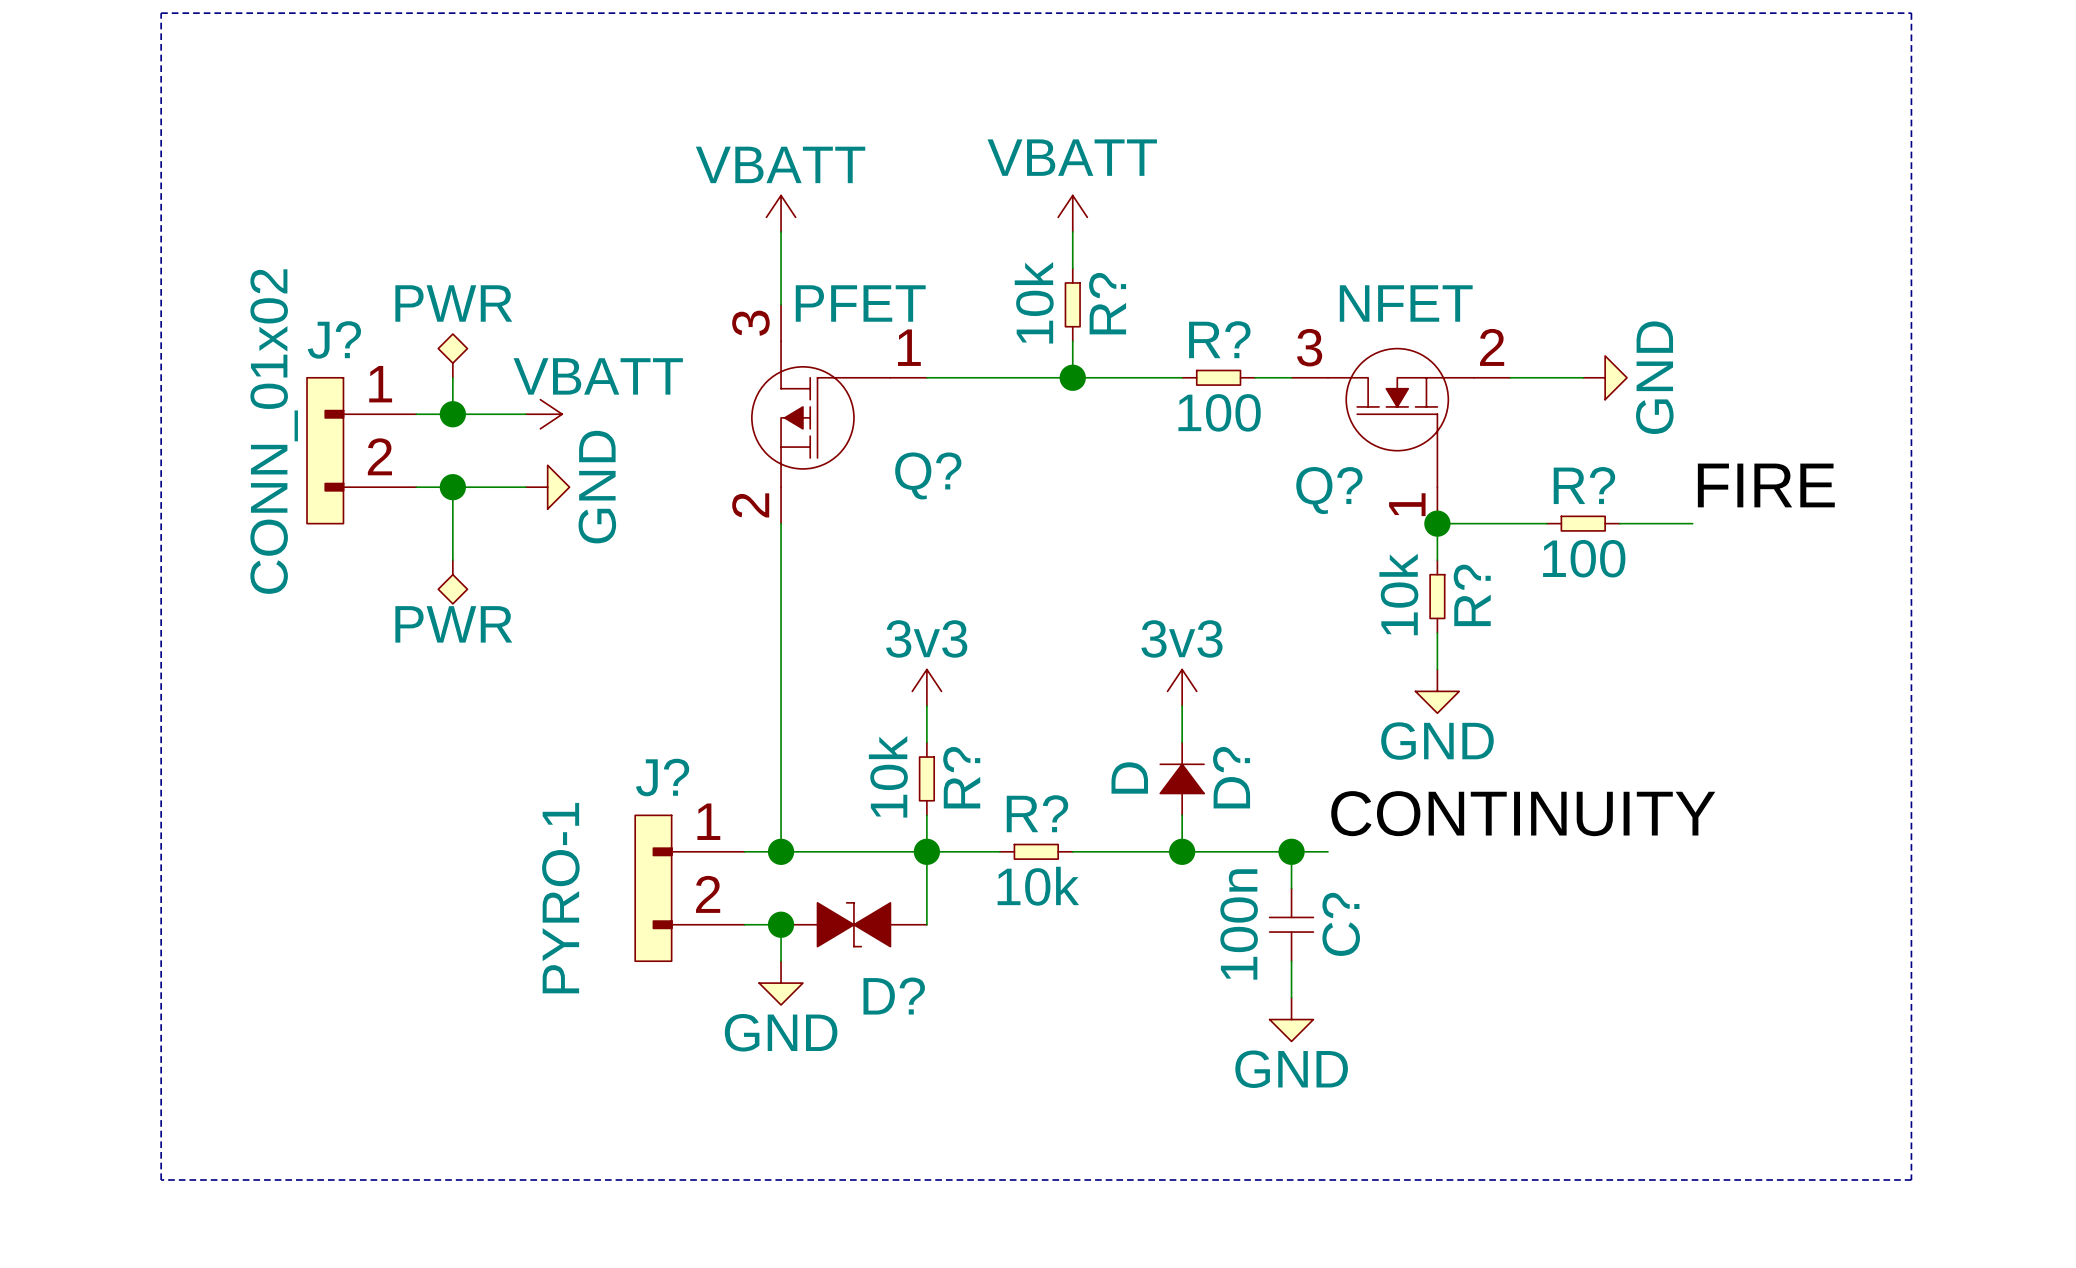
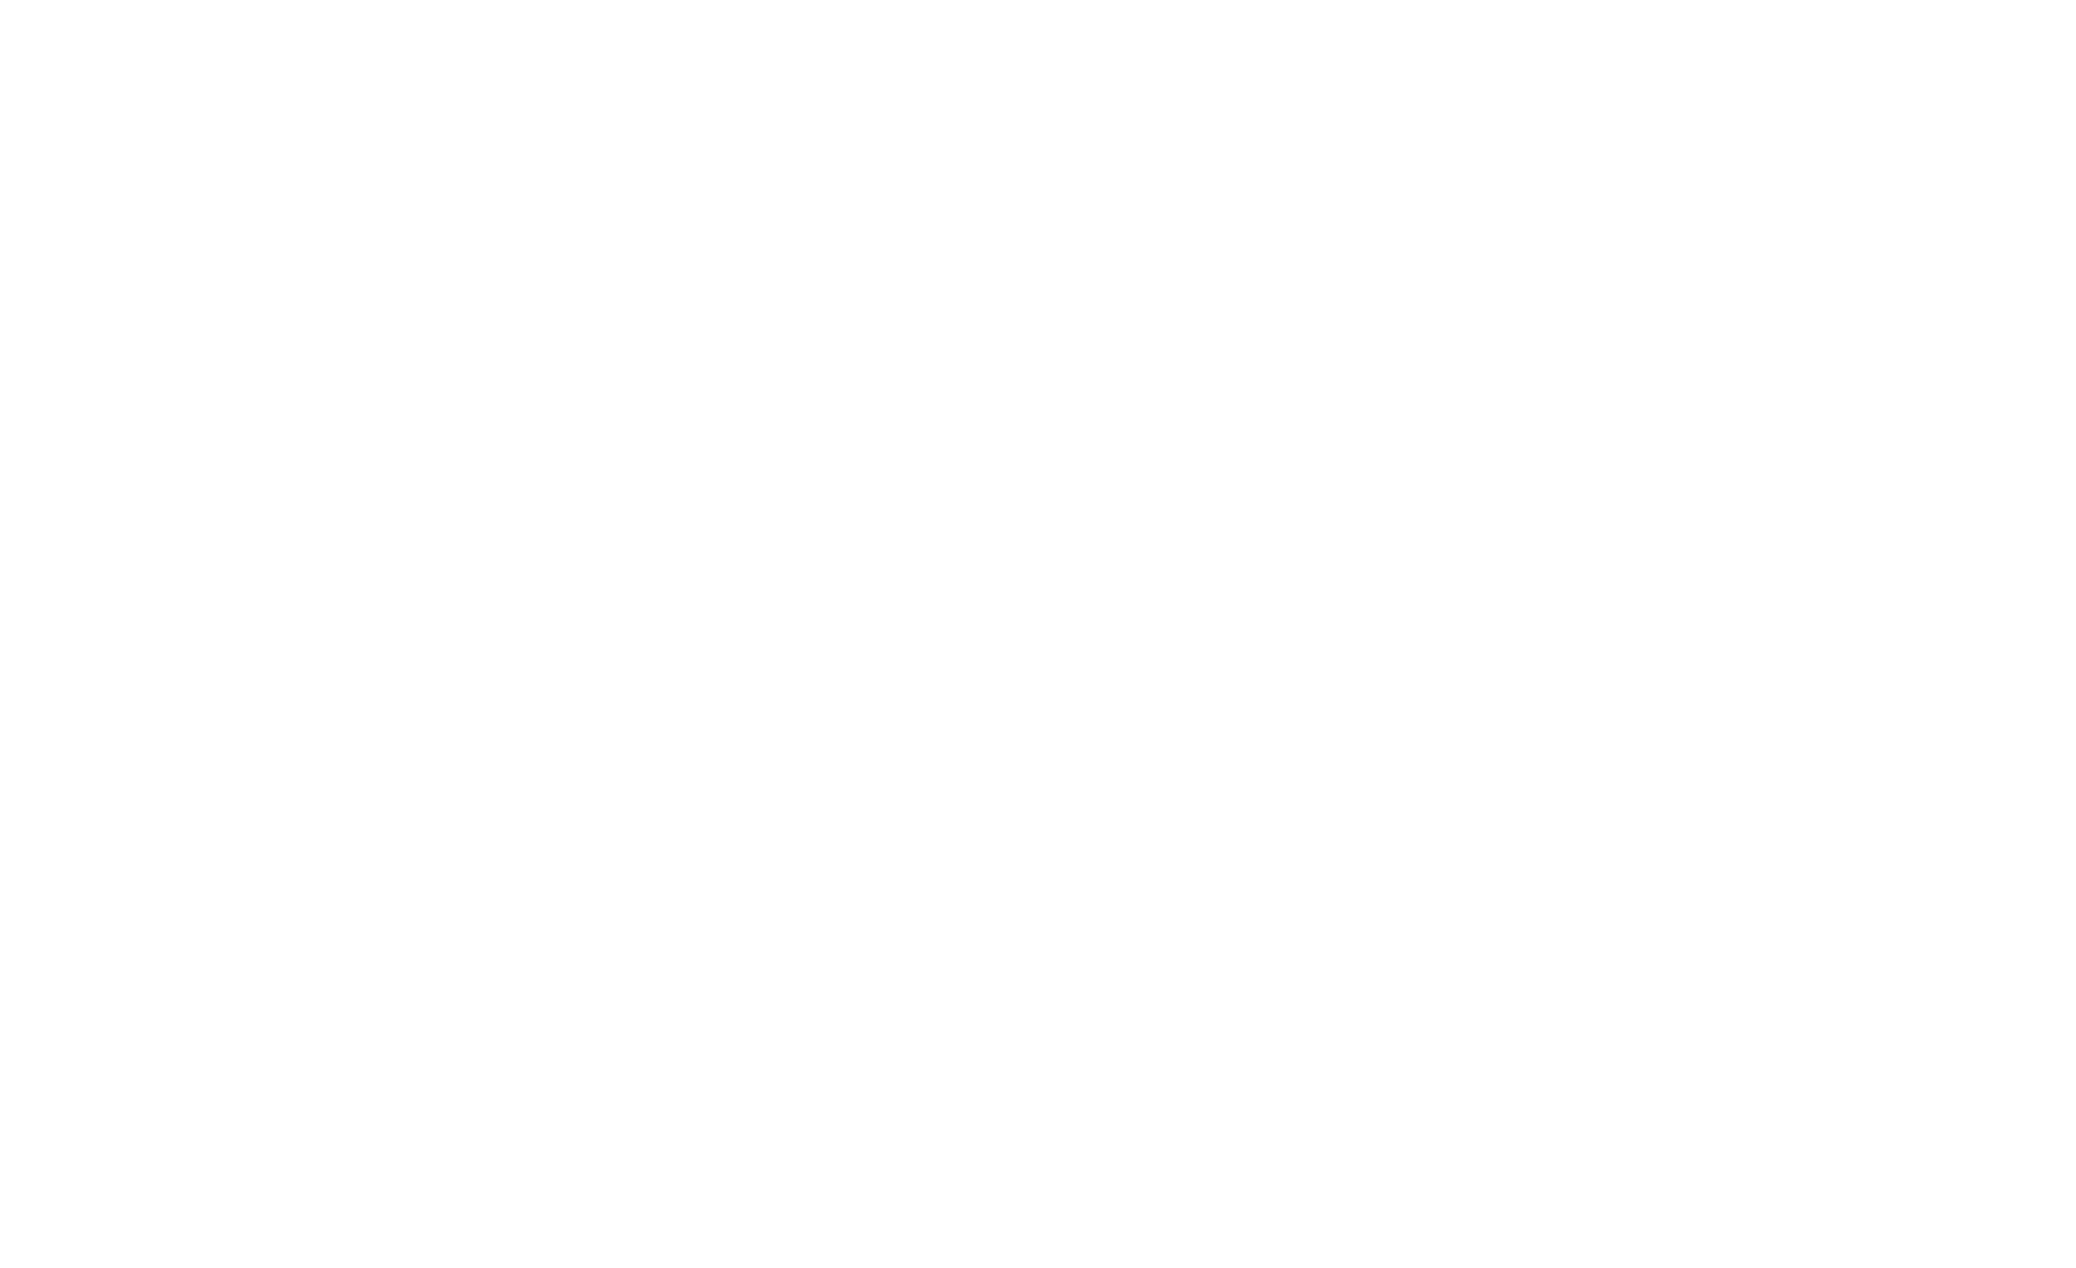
line: (161, 13) (161, 1180) (1911, 1180) (1911, 13) (161, 13) -> none
power symbol: VBATT (781, 213) -> none
power symbol: VBATT (1072, 213) -> none
wire: (781, 231) (781, 304) -> none
wire: (1072, 231) (1072, 268) -> none
R?: 10k (1072, 304) -> none
wire: (1072, 341) (1072, 377) -> none
power symbol: PWR (452, 355) -> none
wire: (452, 377) (452, 414) -> none
wire: (926, 377) (1182, 377) -> none
junction: (1072, 377) -> none
R?: 100 (1218, 377) -> none
wire: (1255, 377) (1291, 377) -> none
wire: (1510, 377) (1583, 377) -> none
power symbol: GND (1605, 377) -> none
wire: (416, 414) (525, 414) -> none
junction: (452, 414) -> none
power symbol: VBATT (544, 414) -> none
Q?: PFET (839, 414) -> none
Q?: NFET (1400, 436) -> none
J?: CONN_01x02 (361, 450) -> none
label: FIRE (1766, 485) -> none
wire: (416, 487) (525, 487) -> none
wire: (452, 487) (452, 560) -> none
junction: (452, 487) -> none
power symbol: GND (547, 487) -> none
wire: (781, 523) (781, 851) -> none
junction: (1437, 523) -> none
wire: (1546, 523) (1437, 523) (1437, 560) -> none
R?: 100 (1583, 523) -> none
wire: (1619, 523) (1692, 523) -> none
power symbol: PWR (452, 581) -> none
R?: 10k (1437, 596) -> none
wire: (1437, 633) (1437, 669) -> none
power symbol: 3v3 (926, 687) -> none
power symbol: 3v3 (1182, 687) -> none
power symbol: GND (1437, 691) -> none
wire: (926, 705) (926, 742) -> none
wire: (1182, 705) (1182, 742) -> none
R?: 10k (926, 778) -> none
D?: D (1182, 778) -> none
label: CONTINUITY (1523, 813) -> none
wire: (926, 815) (926, 924) -> none
wire: (1182, 815) (1182, 851) -> none
wire: (744, 851) (999, 851) -> none
junction: (781, 851) -> none
junction: (926, 851) -> none
R?: 10k (1036, 851) -> none
wire: (1072, 851) (1328, 851) -> none
junction: (1182, 851) -> none
wire: (1291, 851) (1291, 888) -> none
junction: (1291, 851) -> none
J?: PYRO-1 (689, 888) -> none
wire: (744, 924) (781, 924) (781, 961) -> none
junction: (781, 924) -> none
D?: (853, 924) -> none
C?: 100n (1291, 924) -> none
wire: (1291, 961) (1291, 997) -> none
power symbol: GND (781, 983) -> none
power symbol: GND (1291, 1019) -> none

